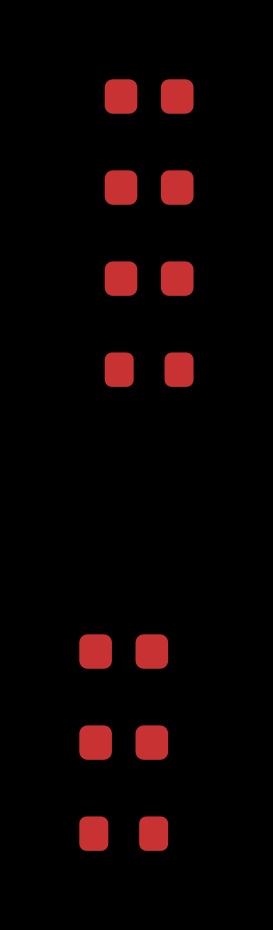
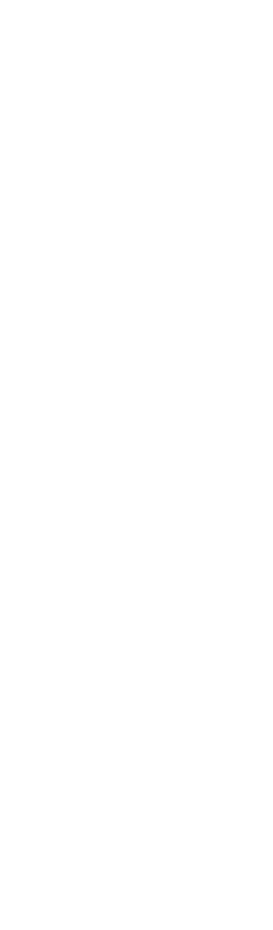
part: (149, 96) -> none
part: (149, 187) -> none
part: (149, 278) -> none
part: (149, 369) -> none
part: (123, 651) -> none
part: (123, 742) -> none
part: (123, 833) -> none

